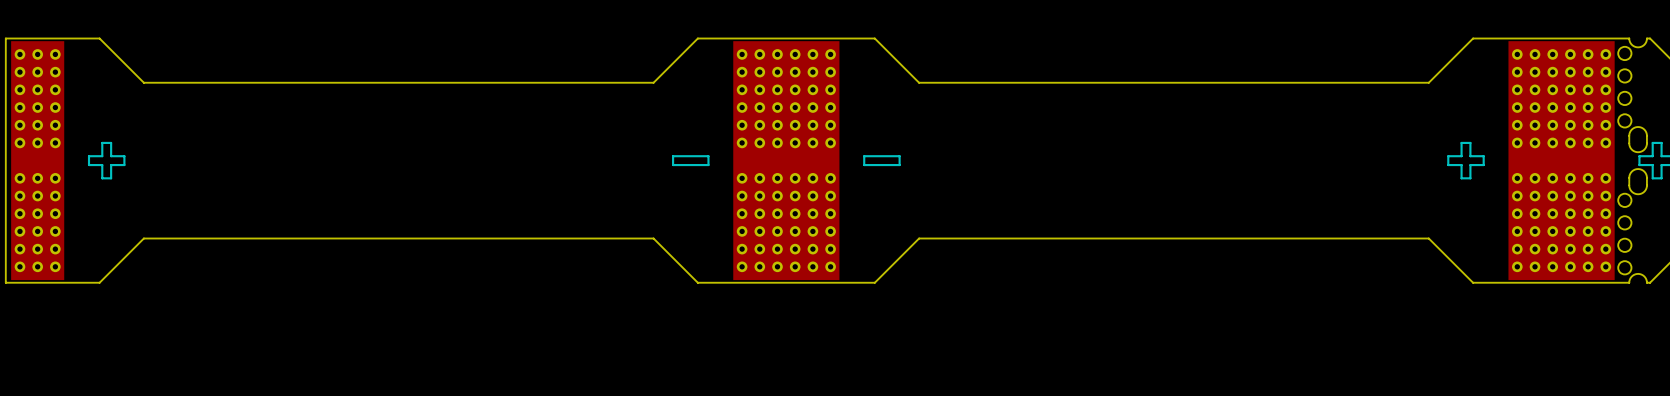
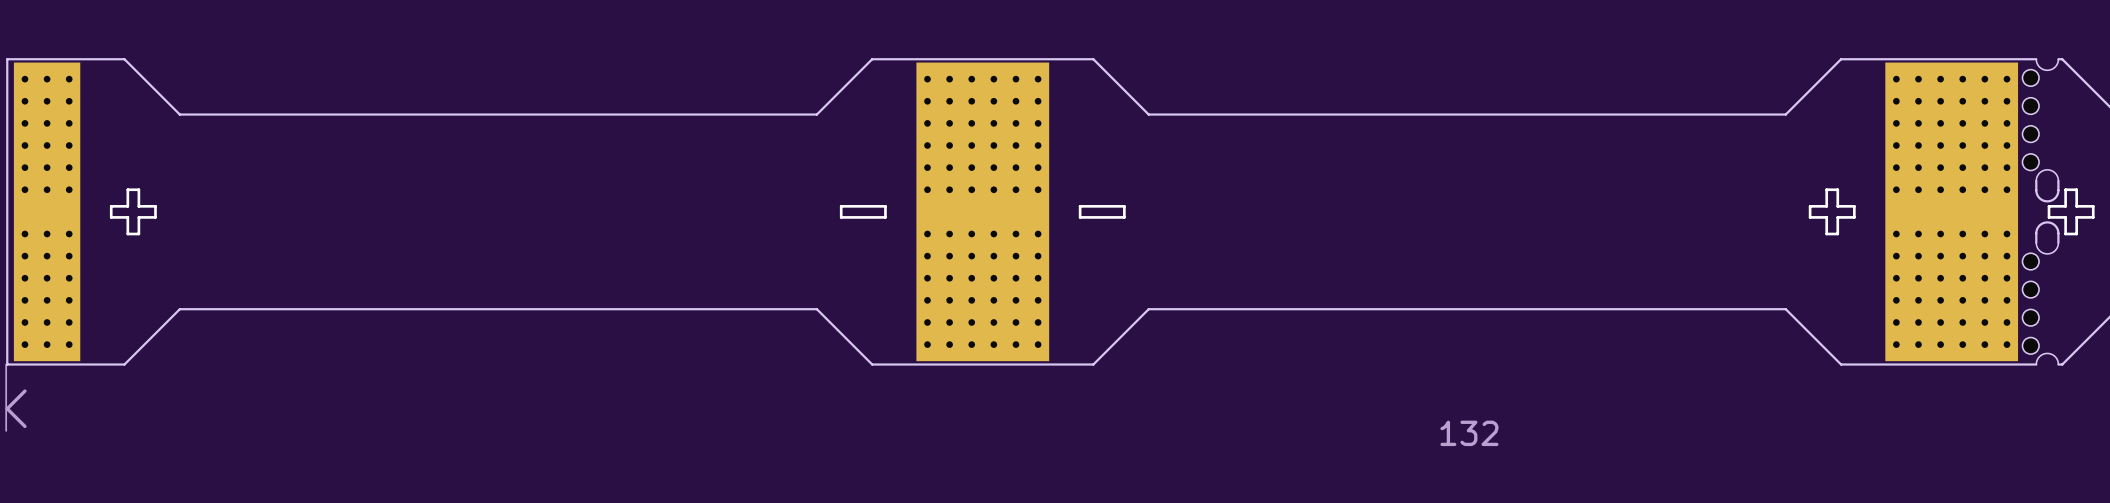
line: none -> (6, 364) (6, 430)
line: none -> (24, 391) (7, 408) (24, 426)
text: none -> 132 (1469, 433)

